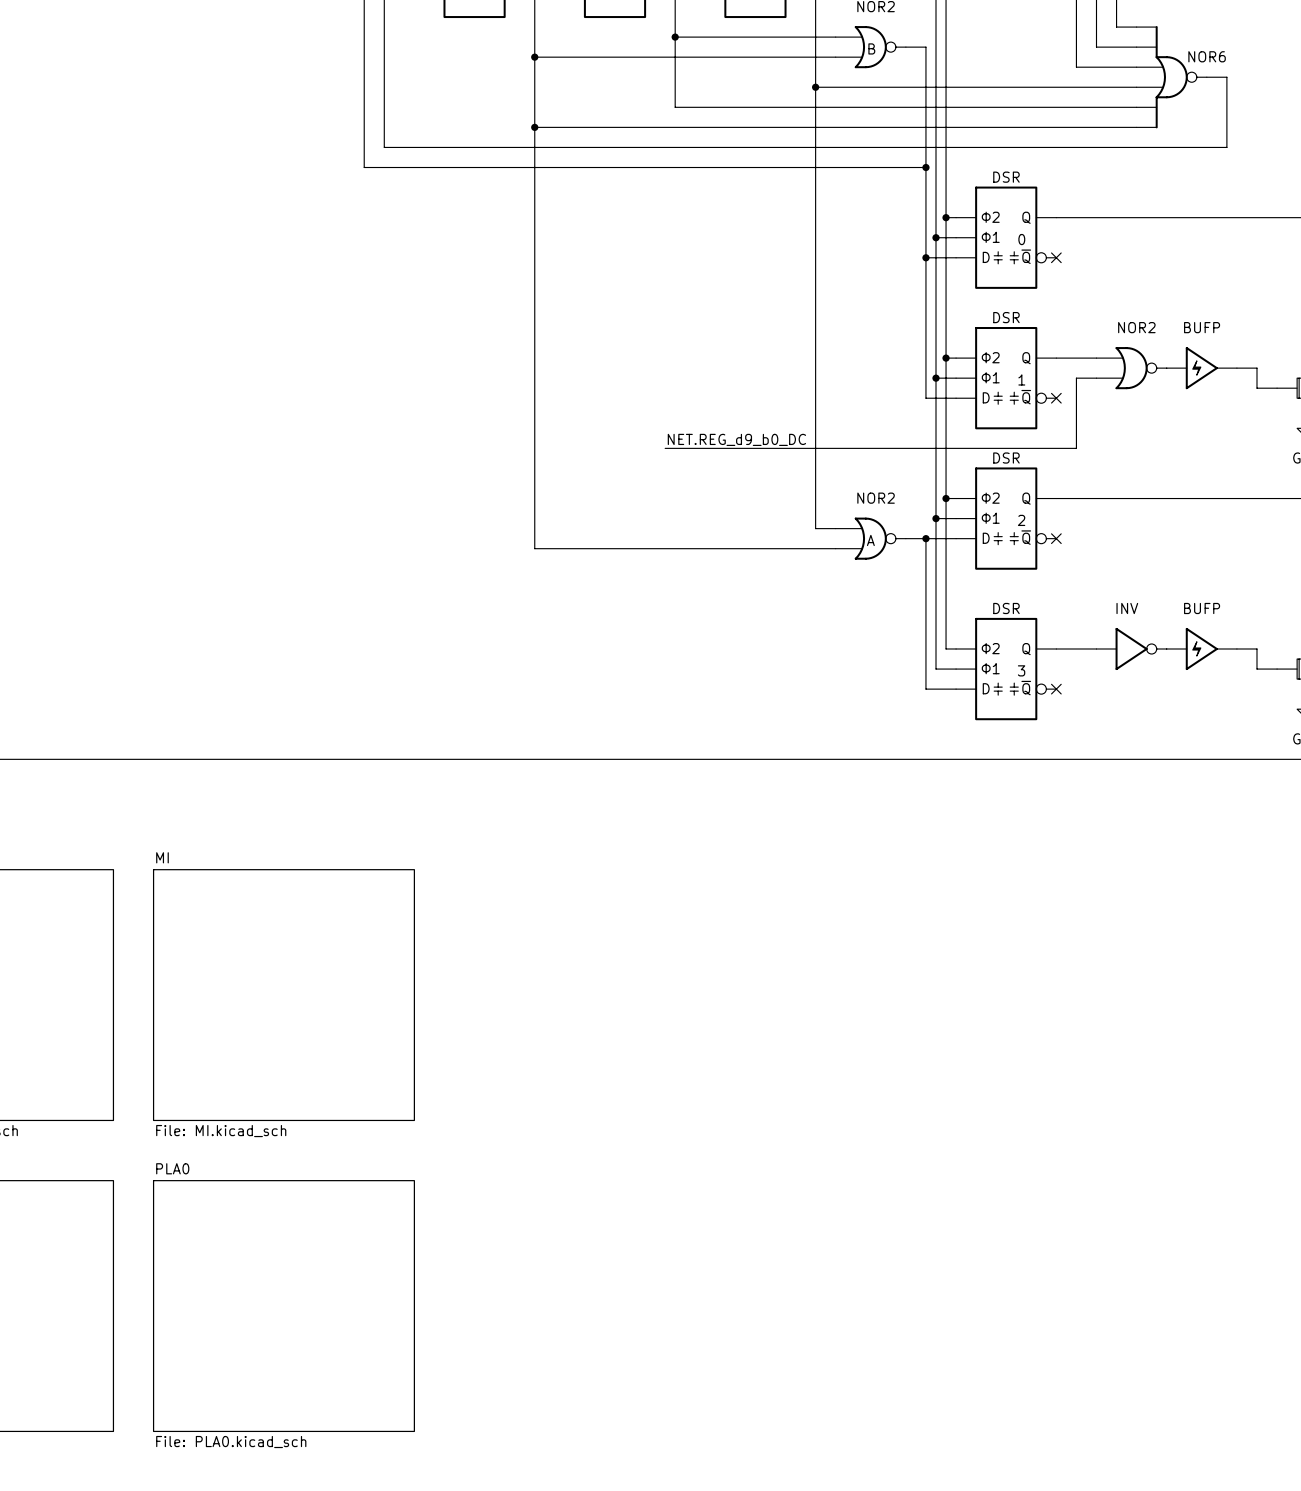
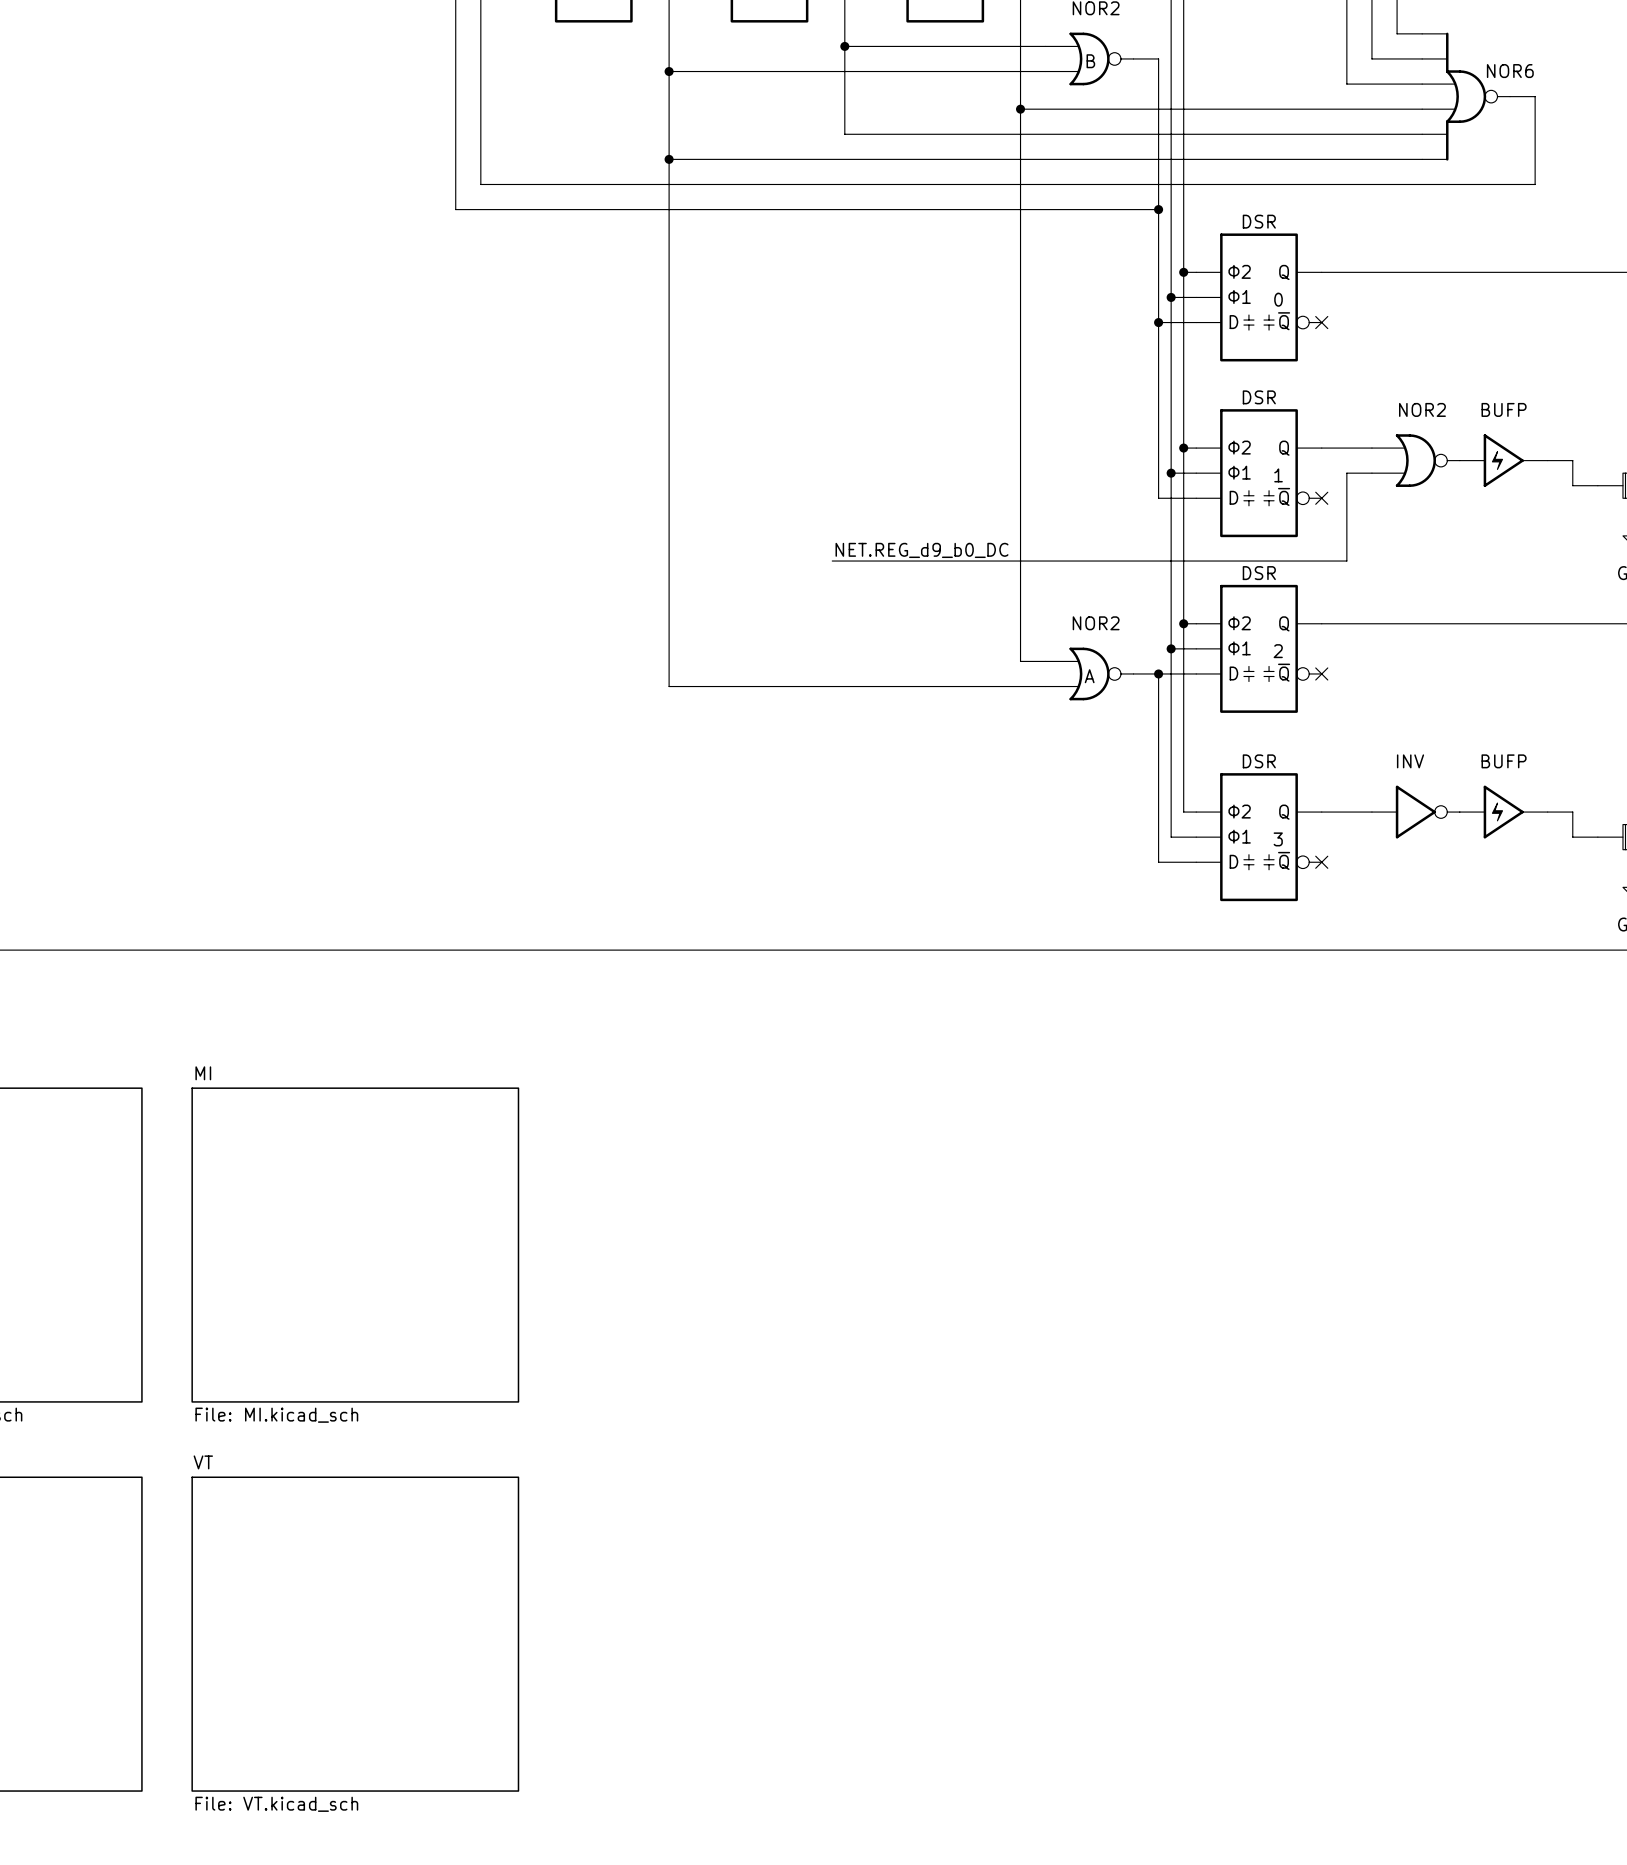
sheet PLA0 name: PLA0 (172, 1168) -> VT (203, 1462)
sheet PLA0 value: File: PLA0.kicad_sch (231, 1442) -> File: VT.kicad_sch (276, 1804)

